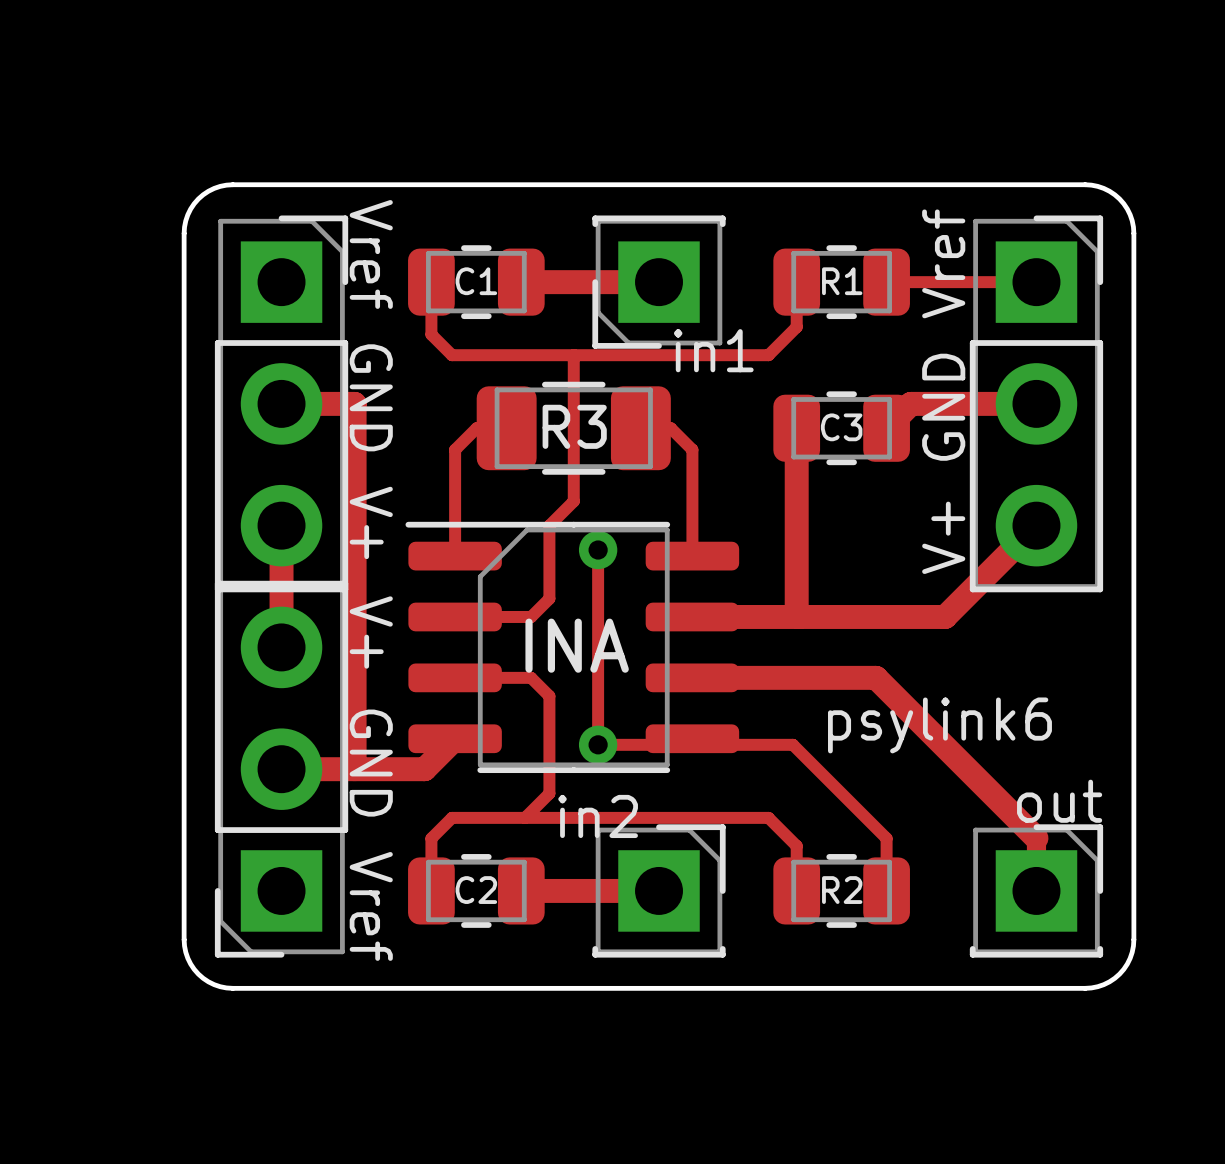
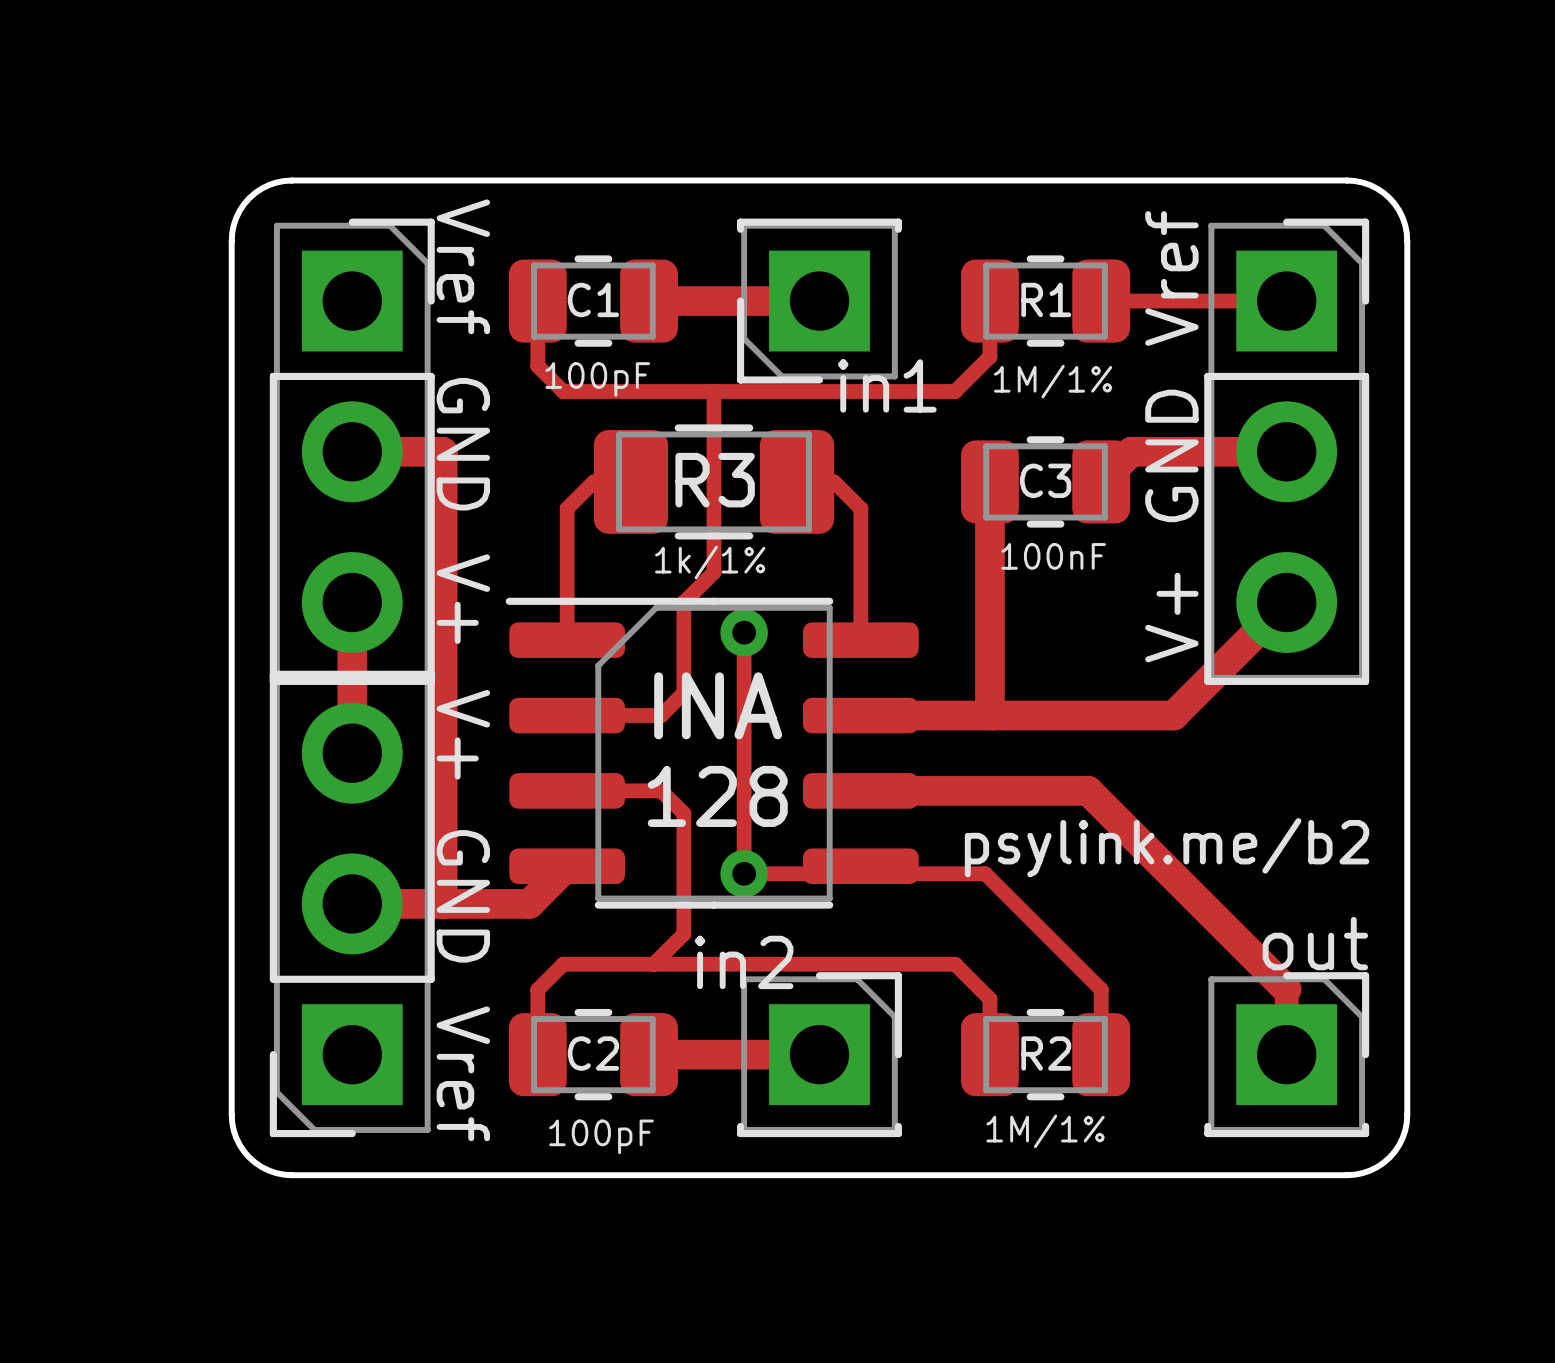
text: none -> 100pF (597, 379)
text: none -> 1M/1% (1053, 381)
text: none -> 100nF (1053, 556)
text: none -> 1k/1% (710, 562)
part text position: INA (577, 645) -> INA (718, 705)
text: none -> 128 (717, 796)
text: psylink6 (939, 725) -> psylink.me/b2 (1167, 847)
text: none -> 1M/1% (1045, 1131)
text: none -> 100pF (601, 1136)

